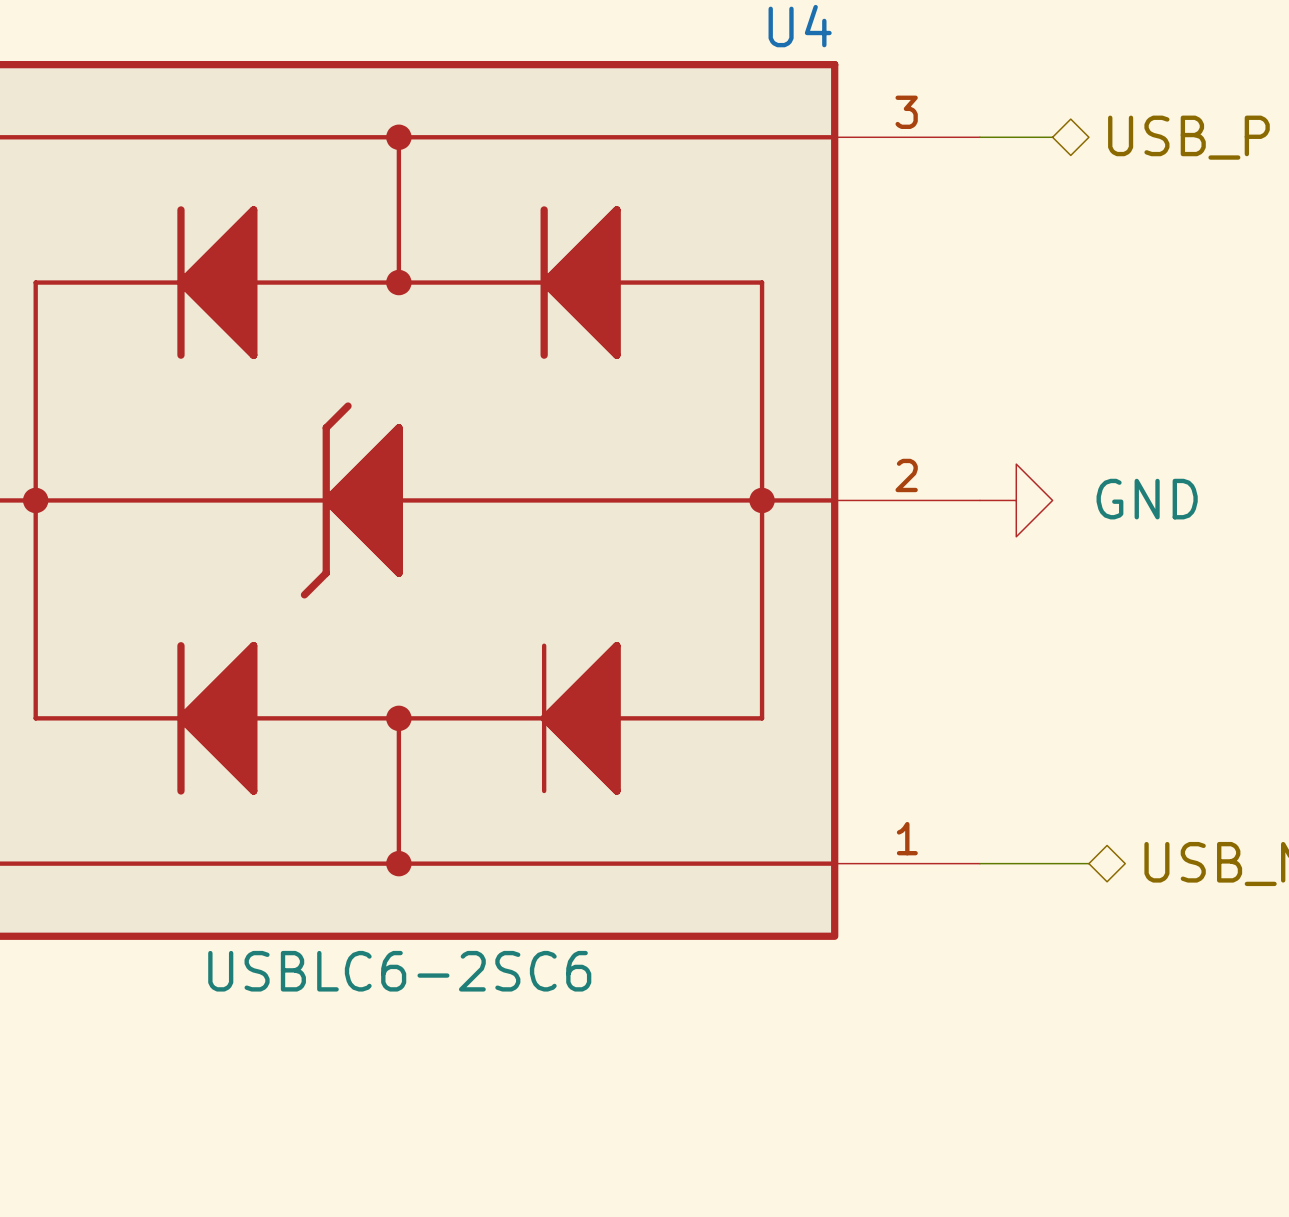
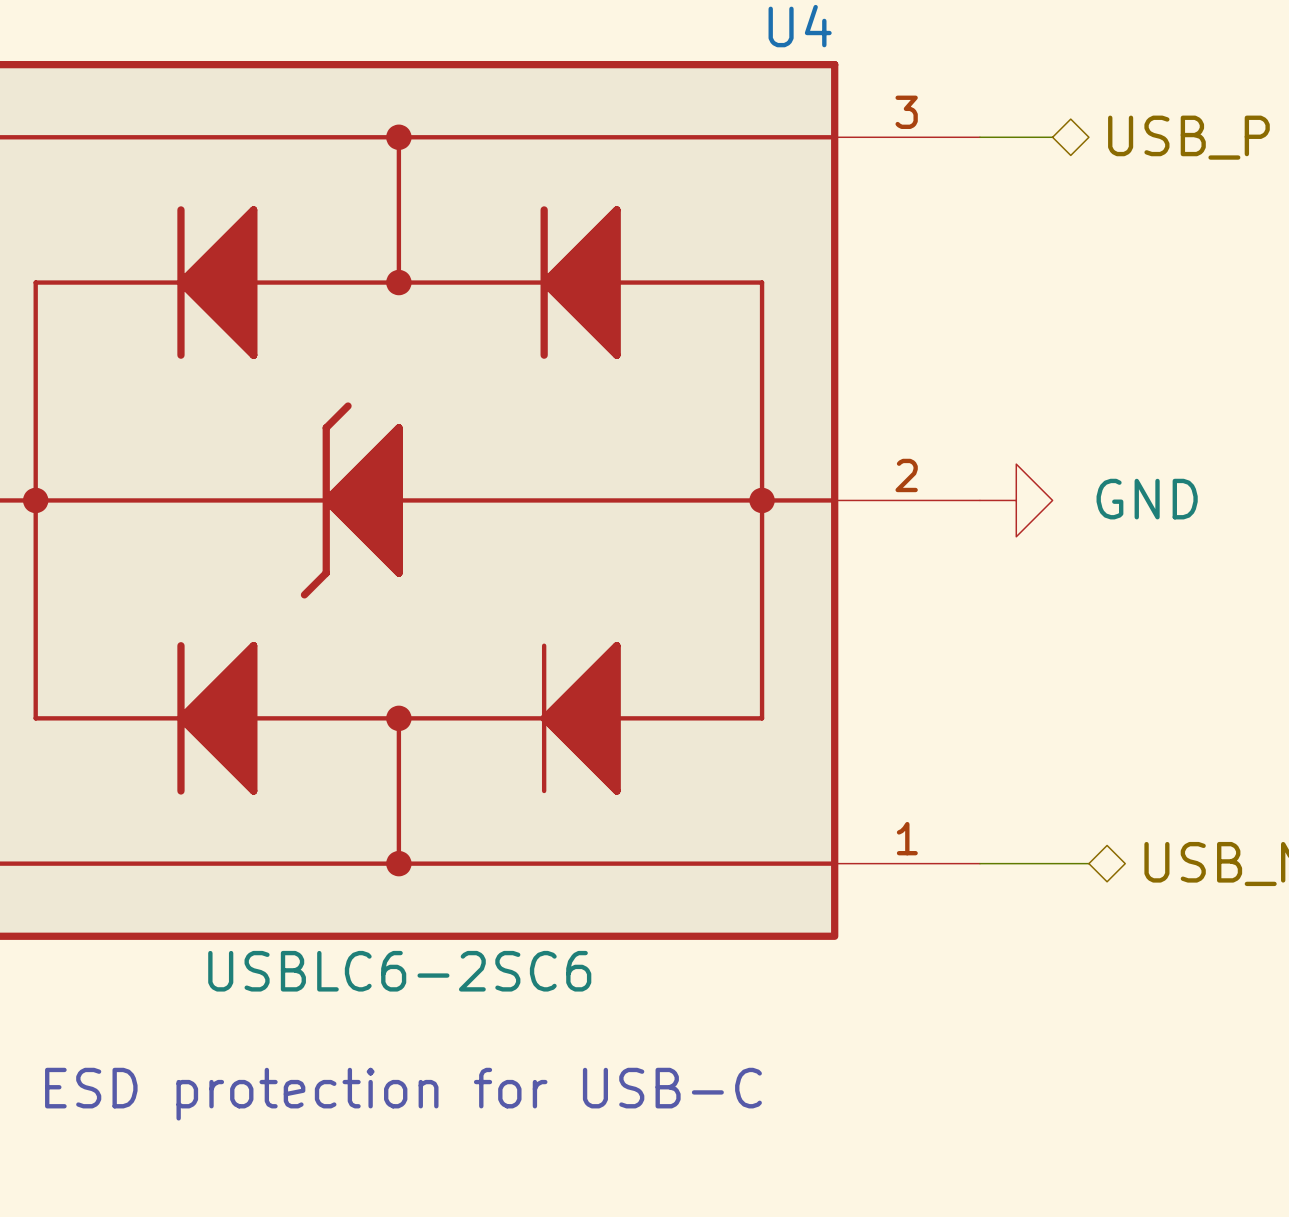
text: none -> ESD protection for USB-C (403, 1094)

